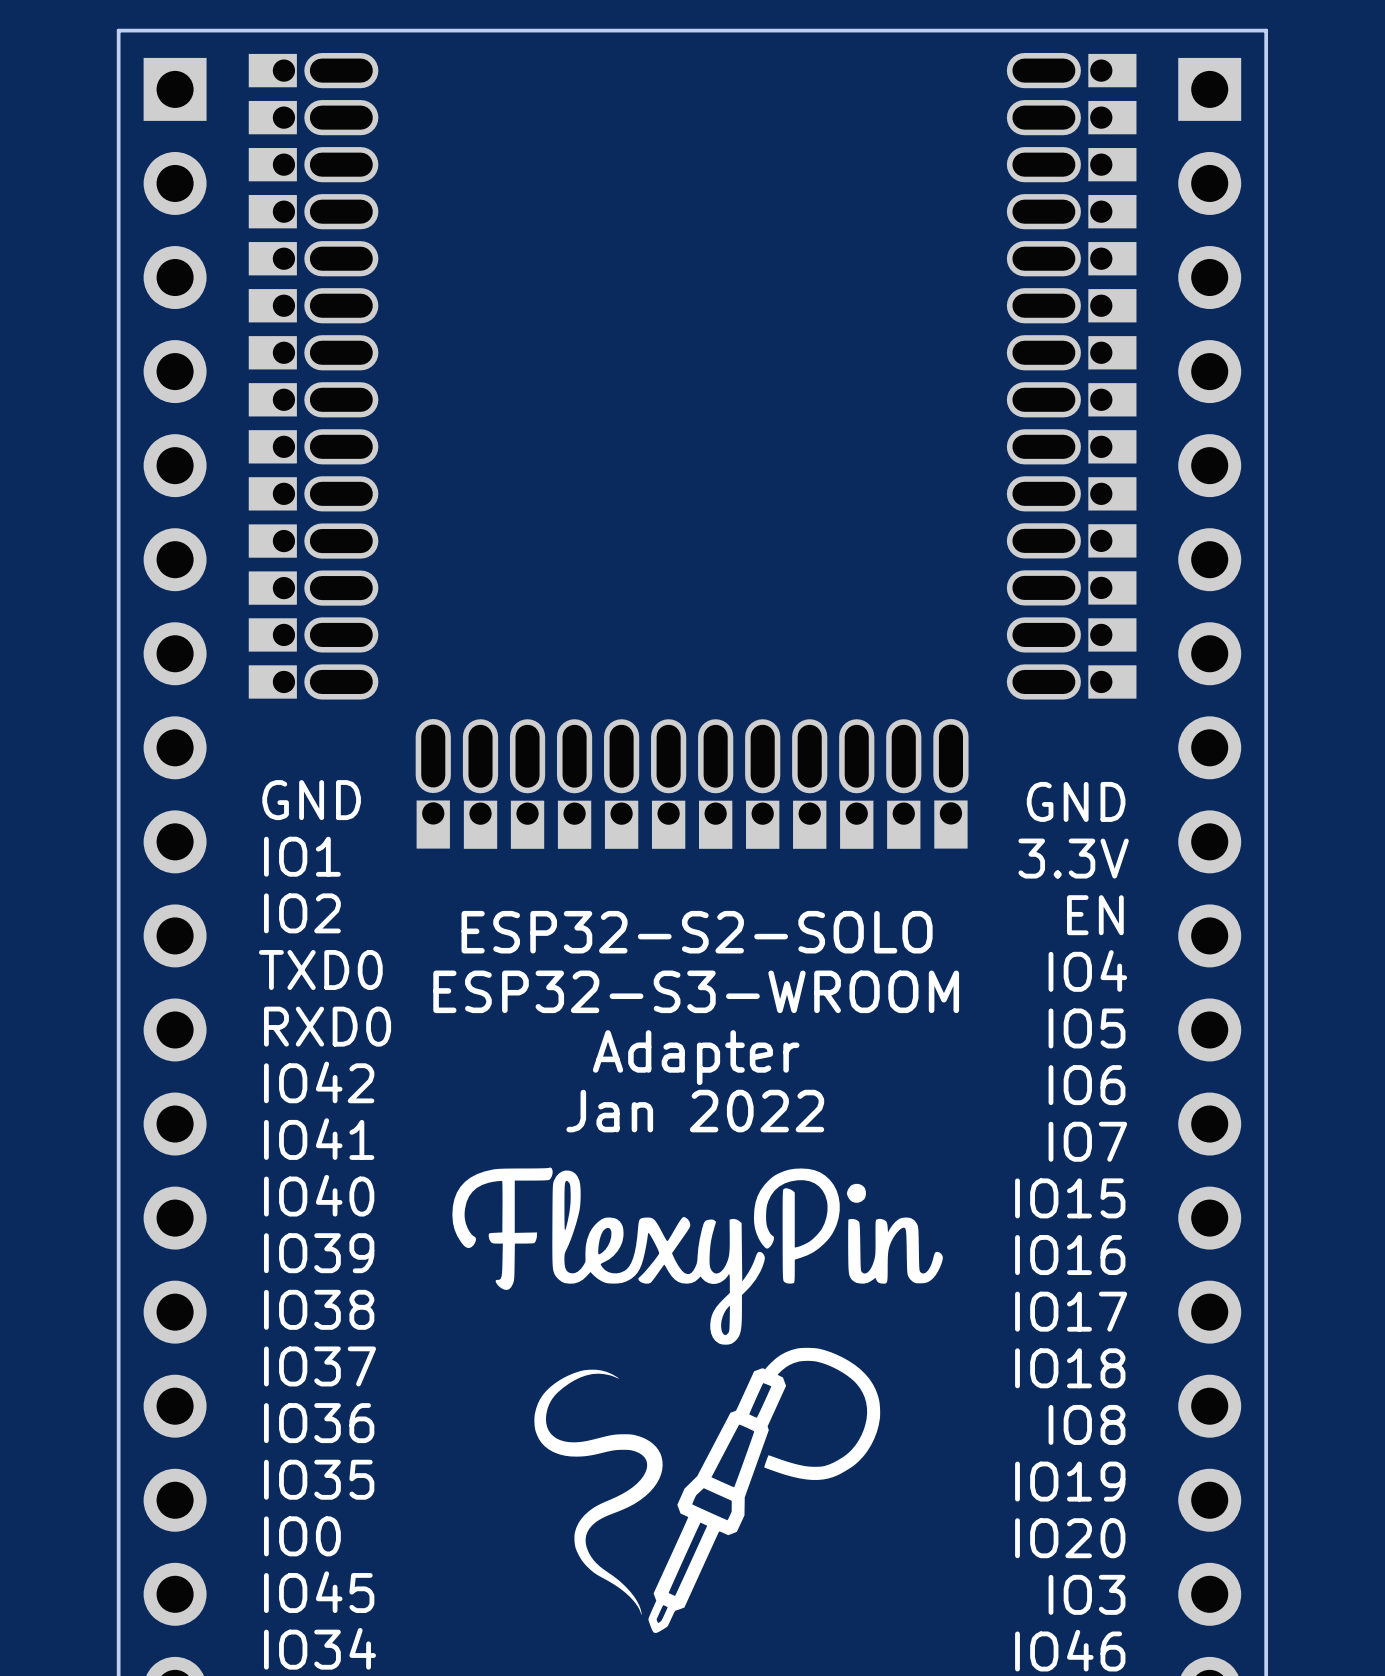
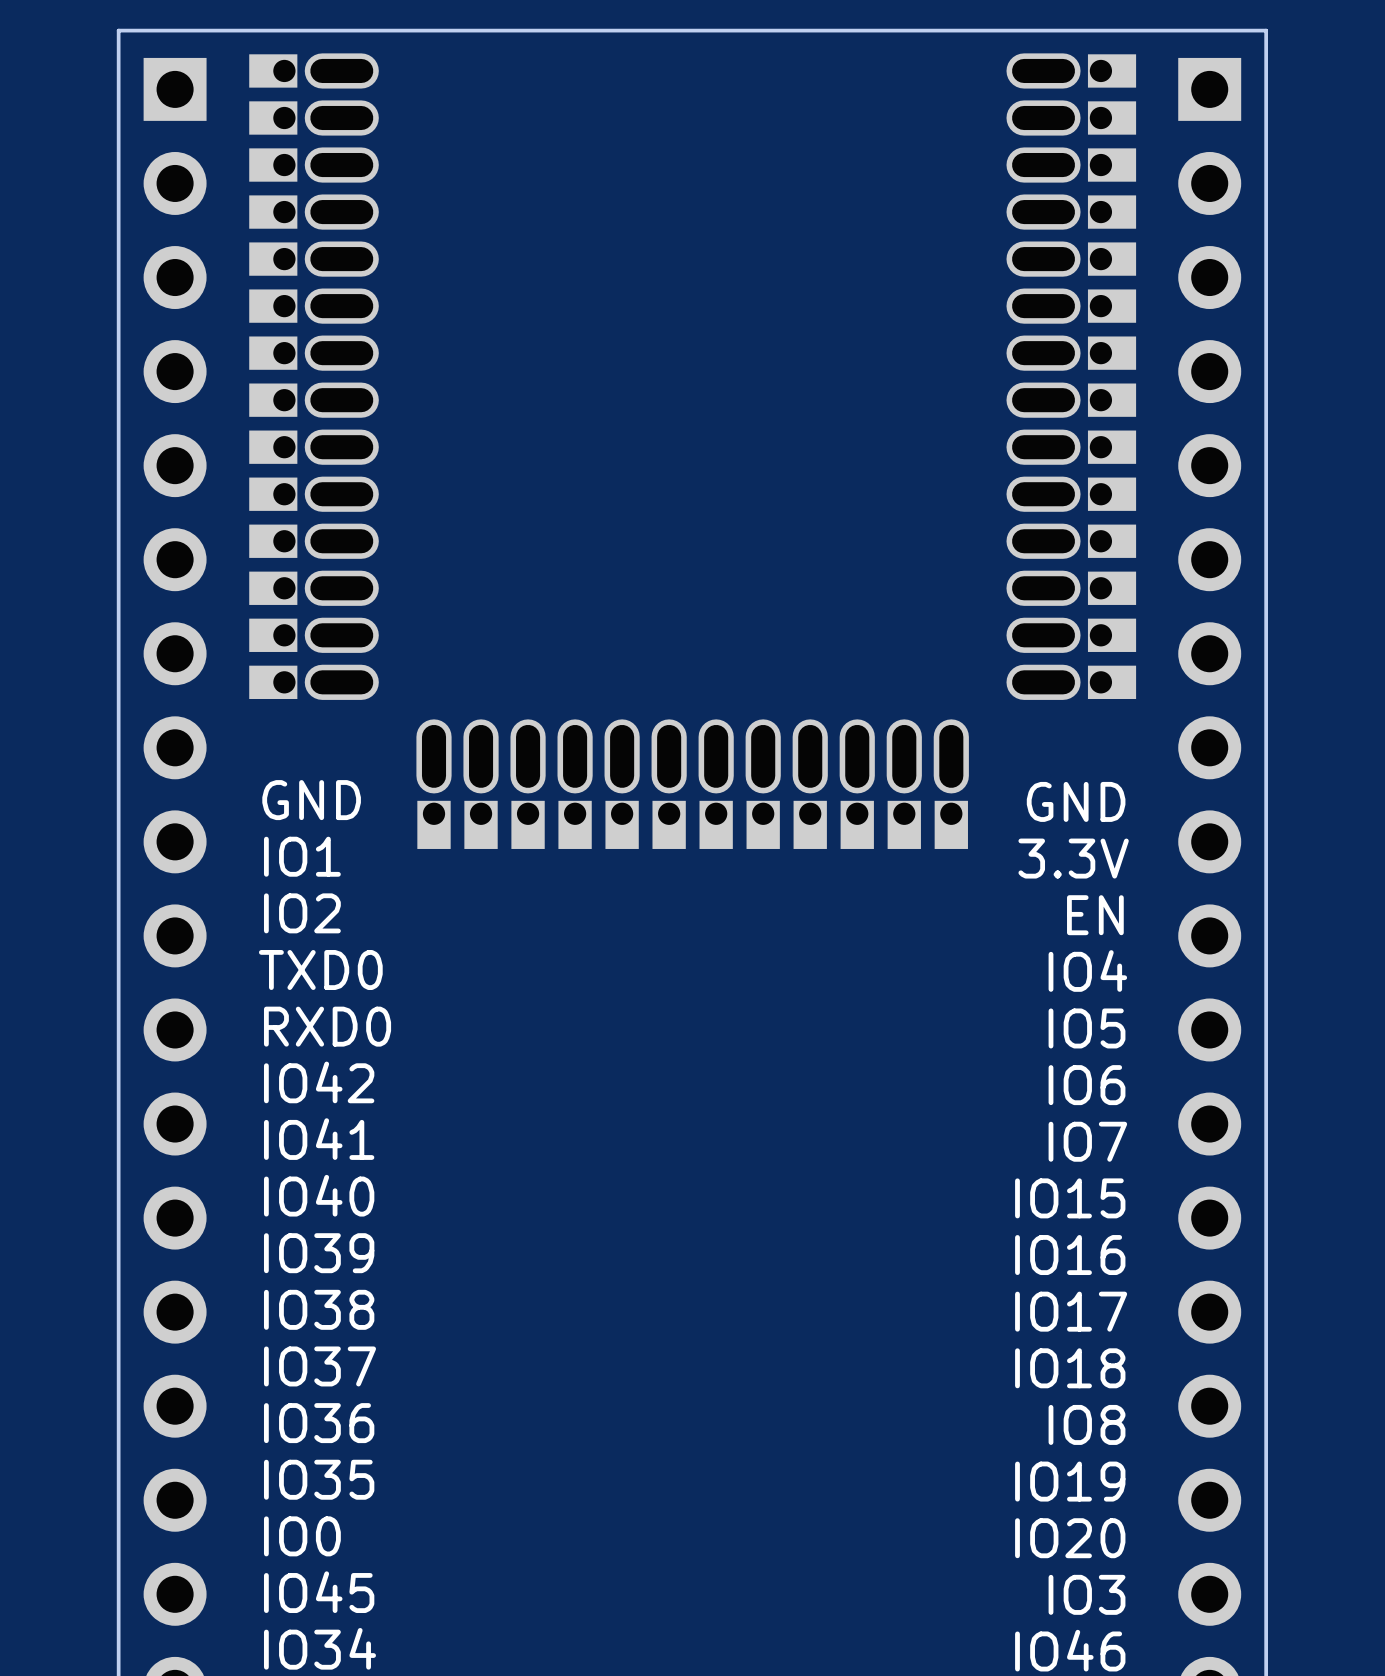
part: (313, 94) -> none
part: (1071, 94) -> none
part: (313, 188) -> none
part: (1071, 188) -> none
part: (313, 282) -> none
part: (1071, 282) -> none
part footprint: [248, 335, 379, 418] -> [249, 53, 379, 700]
part footprint: [1006, 335, 1137, 418] -> [1006, 53, 1137, 700]
part: (313, 470) -> none
part: (1071, 470) -> none
part: (313, 564) -> none
part: (1071, 564) -> none
part: (313, 658) -> none
part: (1071, 658) -> none
part footprint: [651, 719, 734, 849] -> [416, 719, 969, 849]
part: (433, 783) -> none
part: (950, 783) -> none
part: (504, 784) -> none
part: (598, 784) -> none
part: (786, 784) -> none
part: (880, 784) -> none
text: ESP32-S2-SOLO (697, 932) -> none
text: ESP32-S3-WROOM (696, 991) -> none
text: Adapter (696, 1057) -> none
text: Jan 2022 (695, 1111) -> none
drawing: [452, 1167, 943, 1634] -> none

